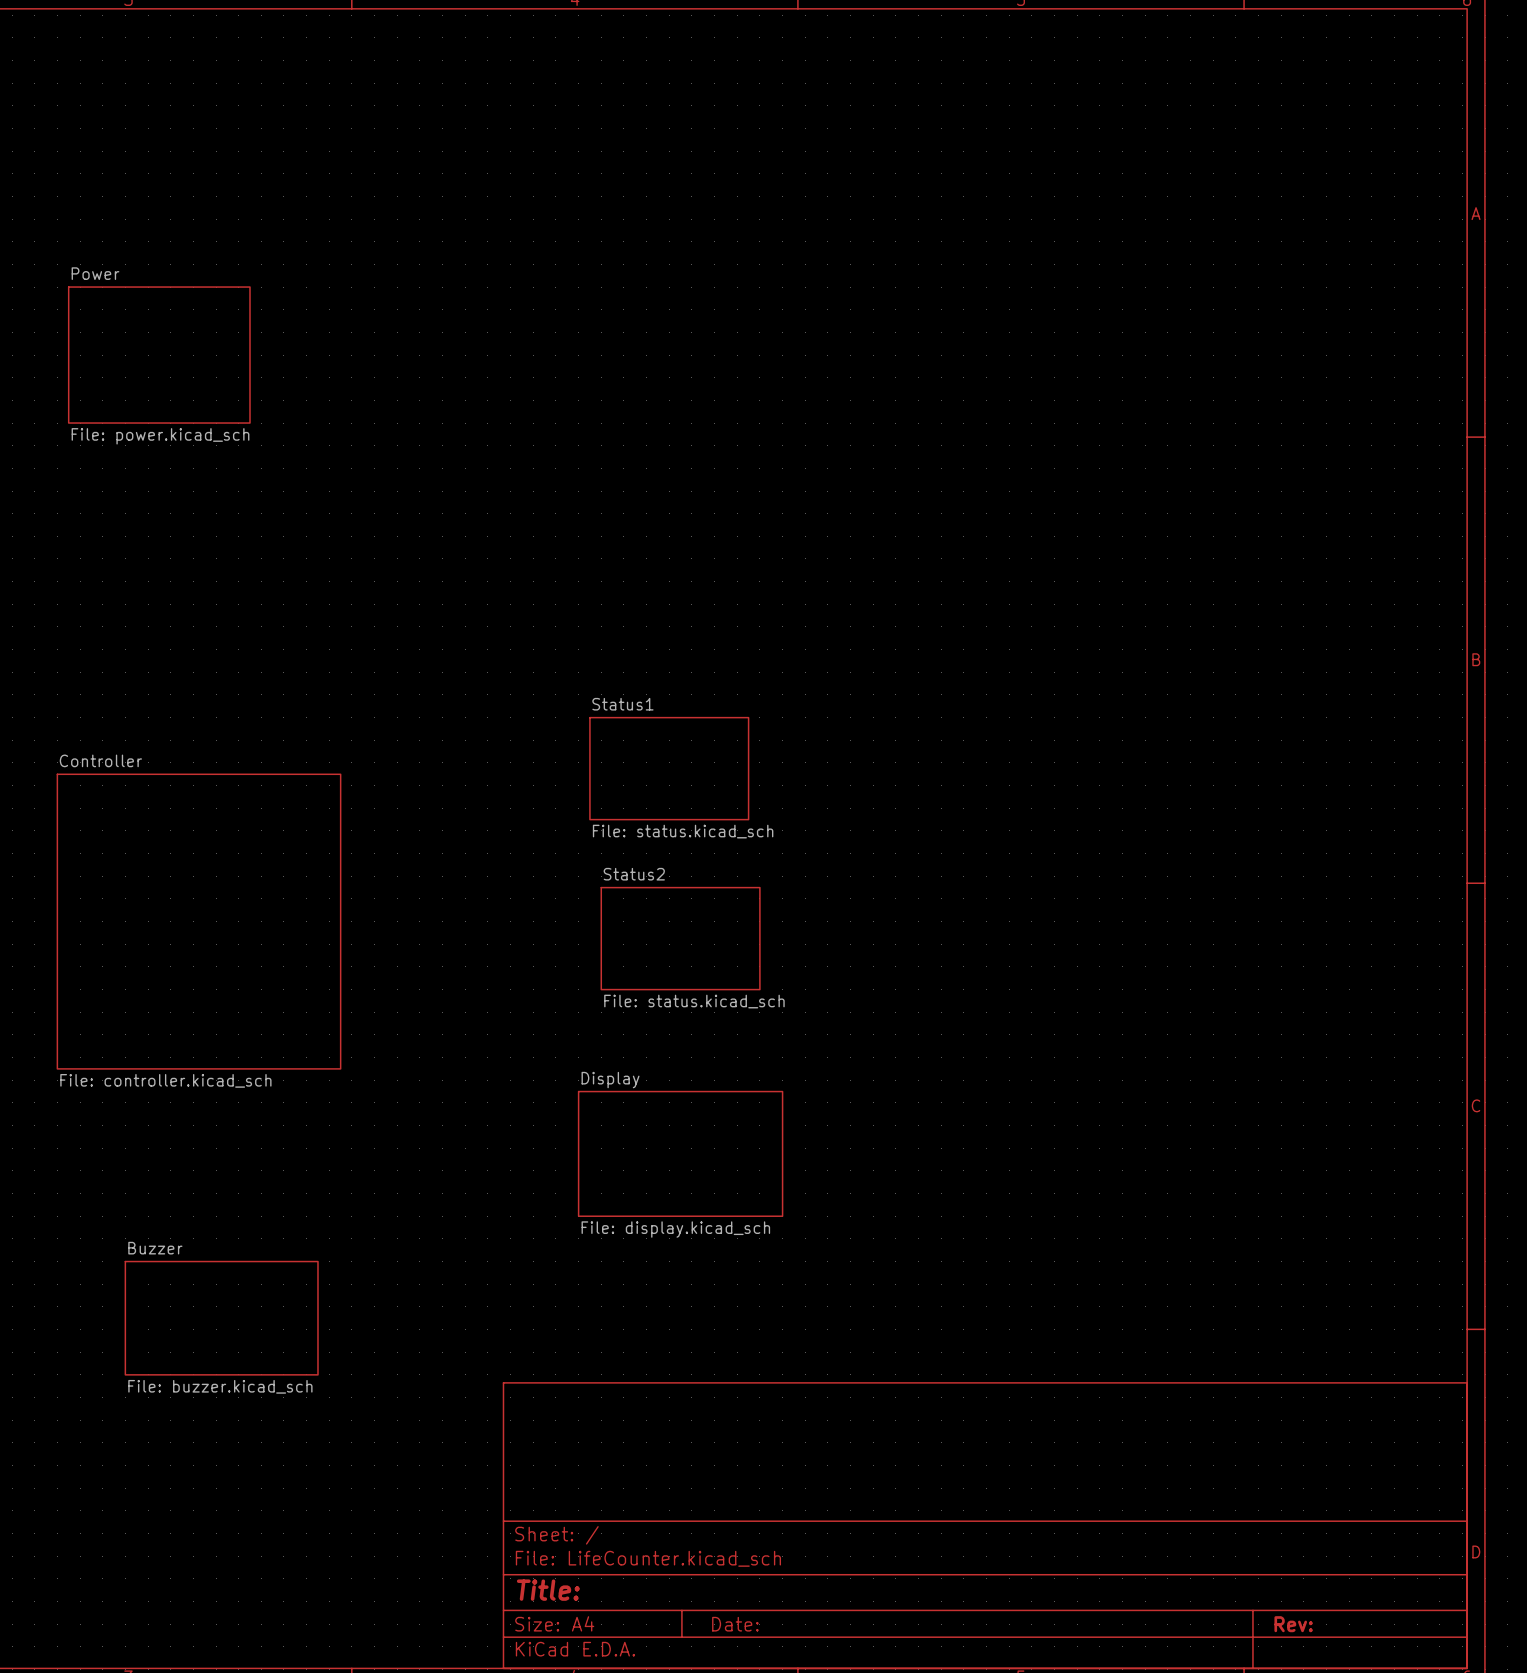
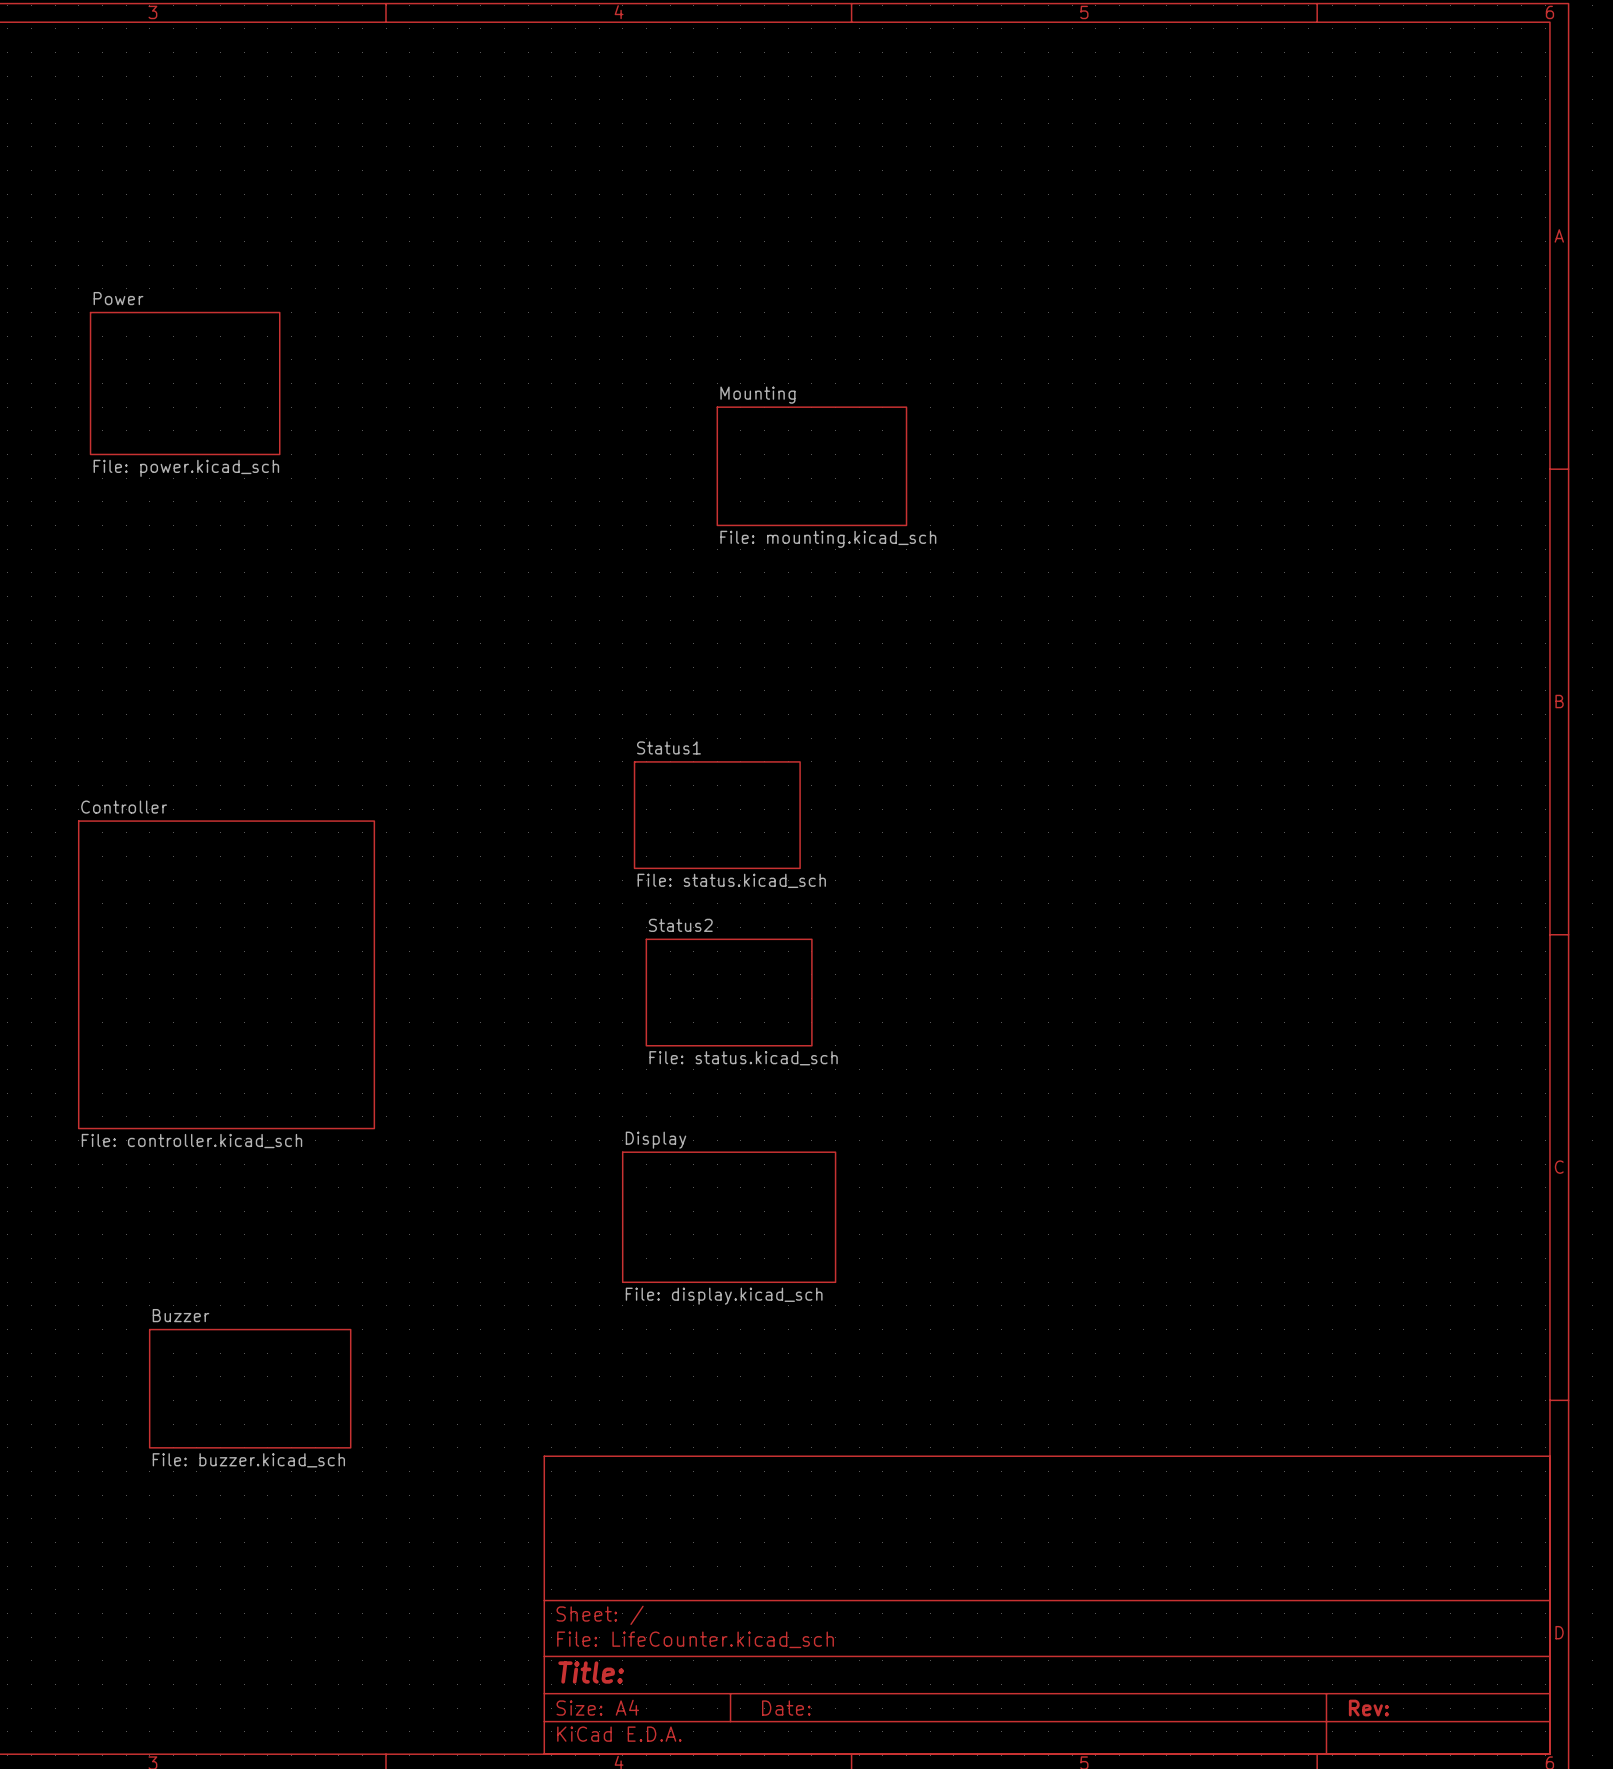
sheet Mounting: none -> File: mounting.kicad_sch (811, 466)

